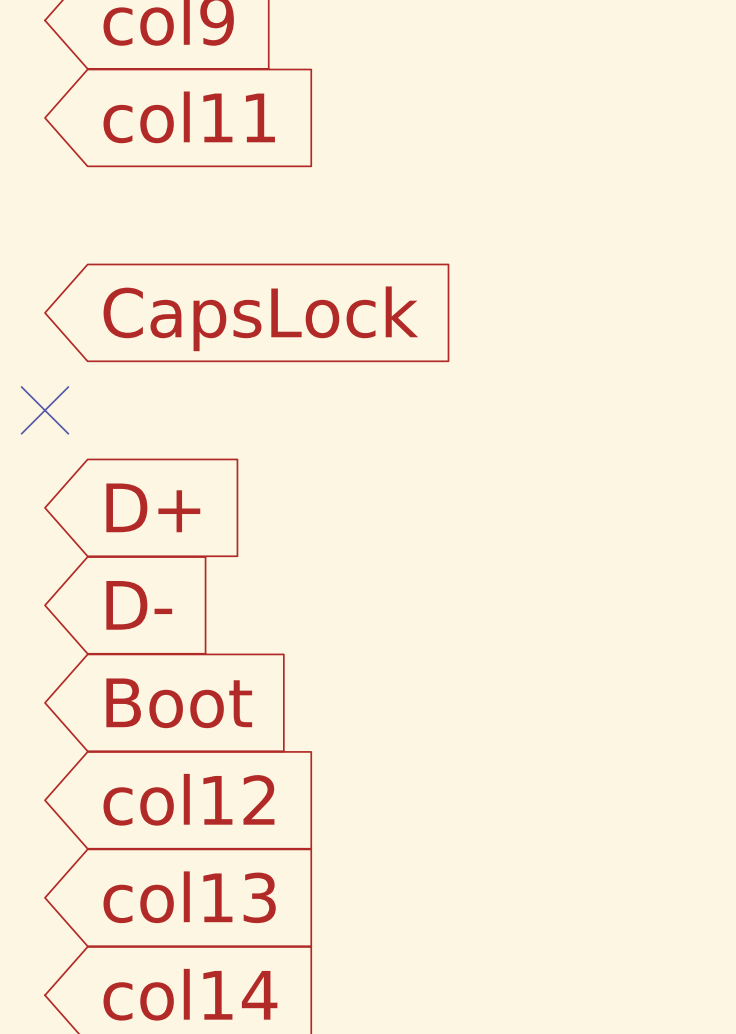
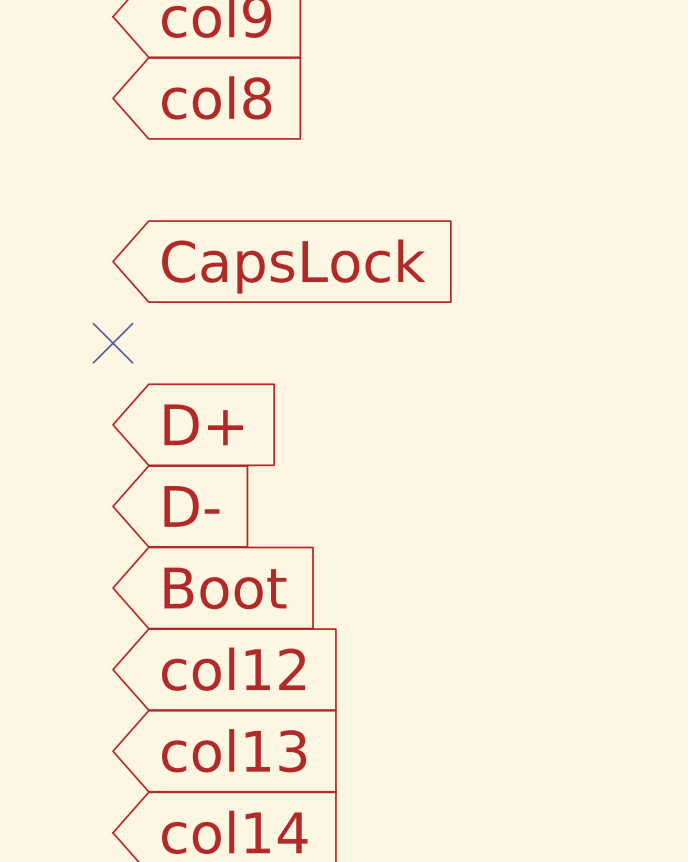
global label: col11 (189, 117) -> col8 (216, 97)

